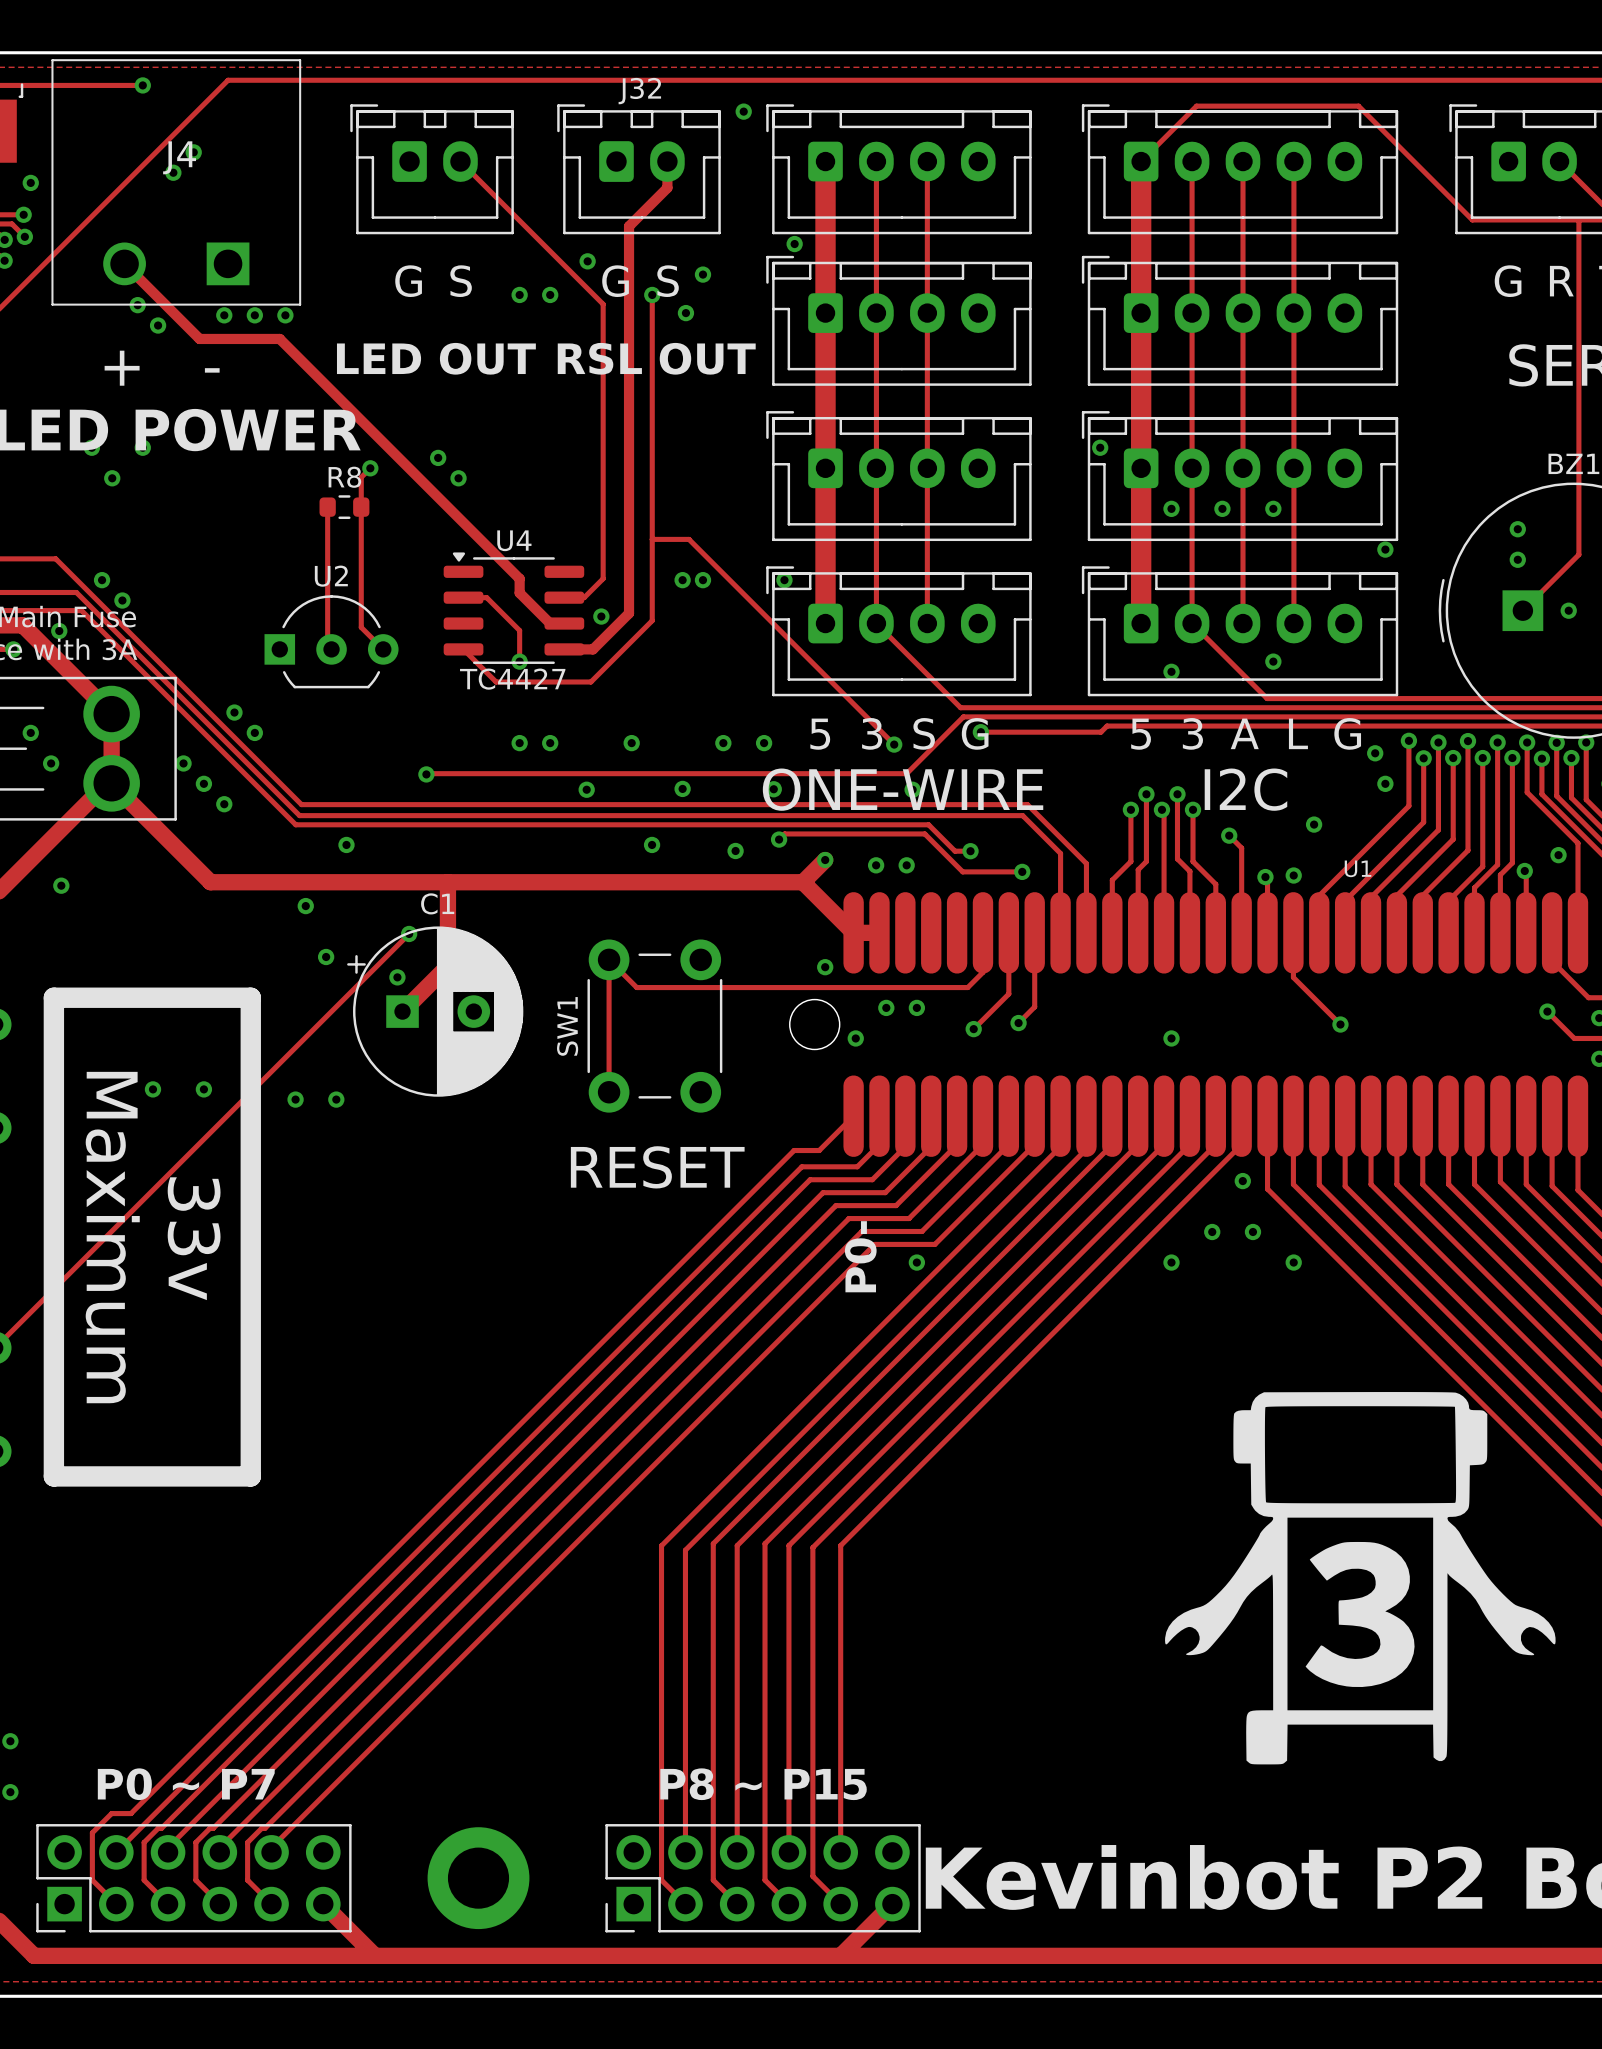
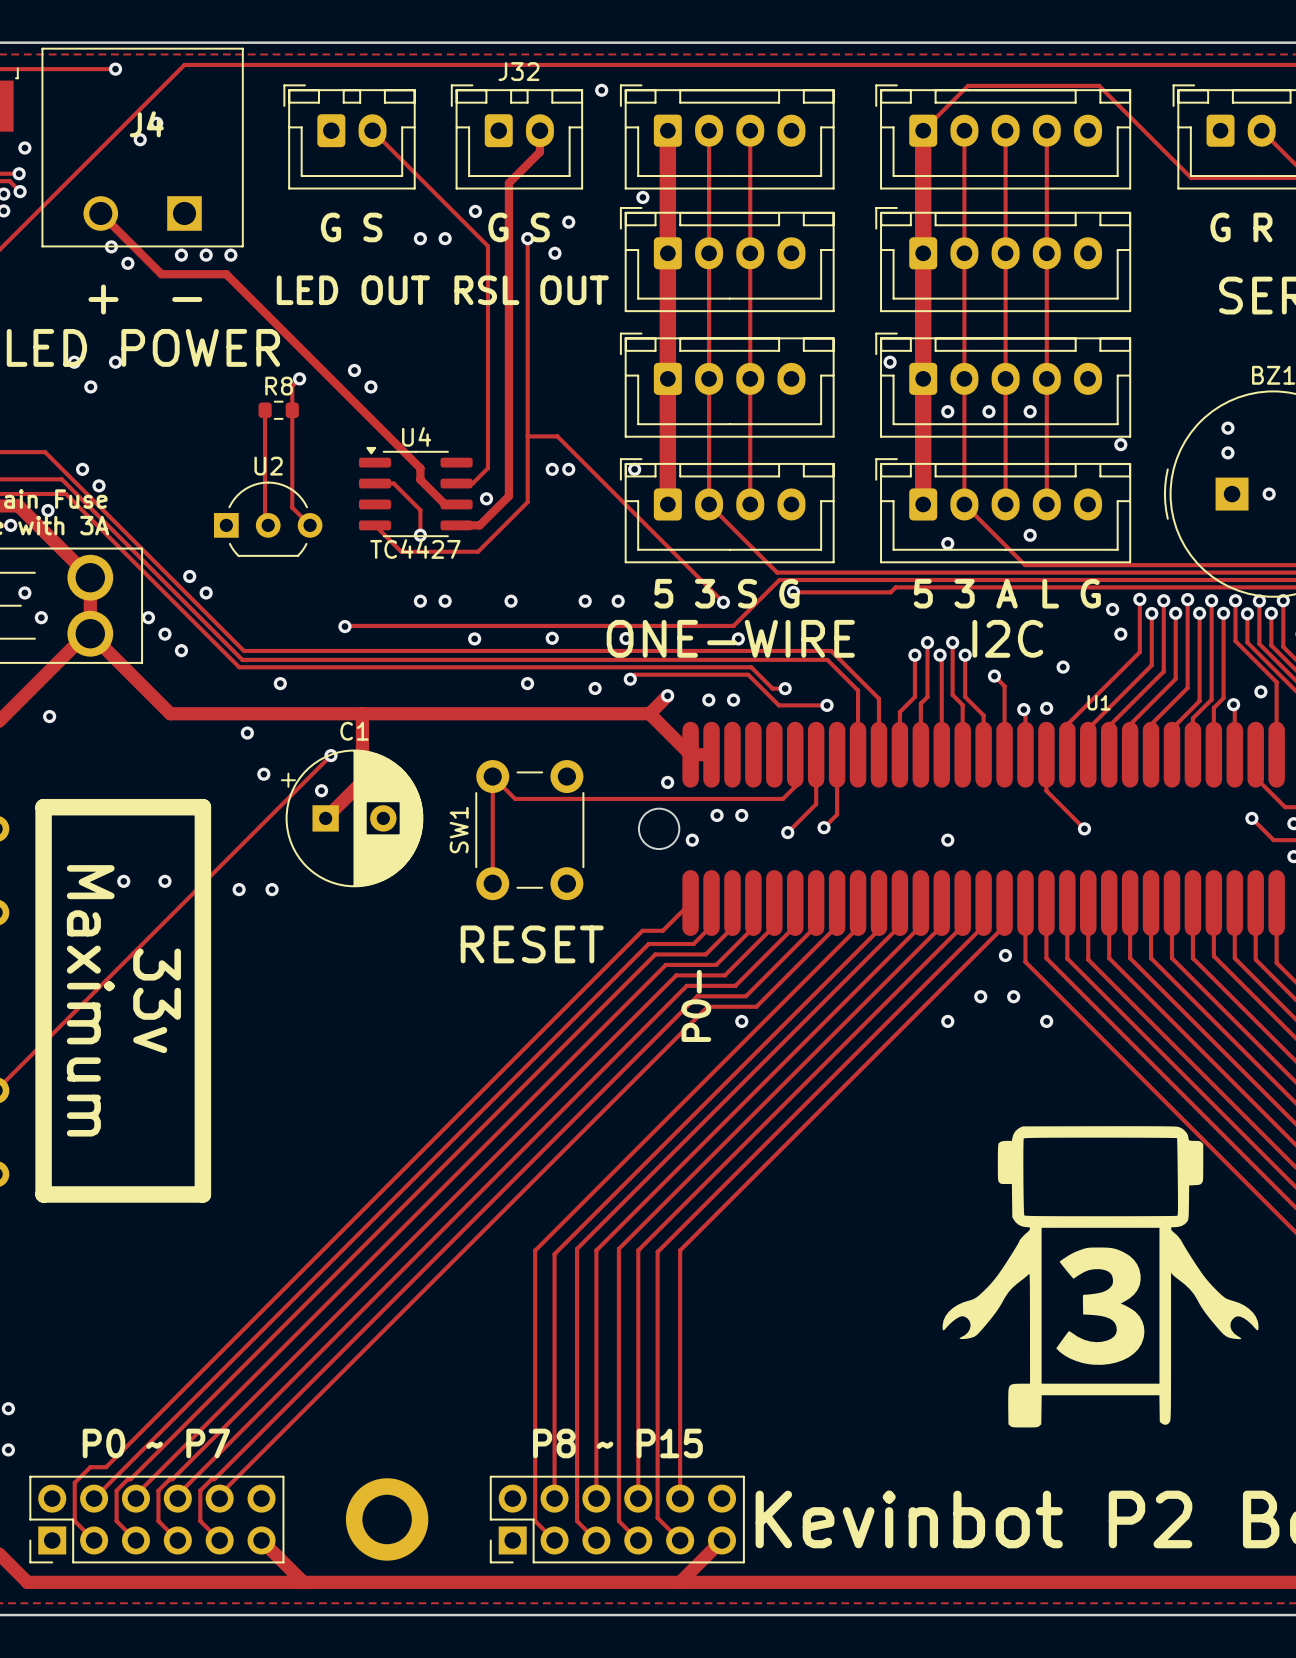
track: (1578, 219) (1578, 554) (1522, 610) -> none

